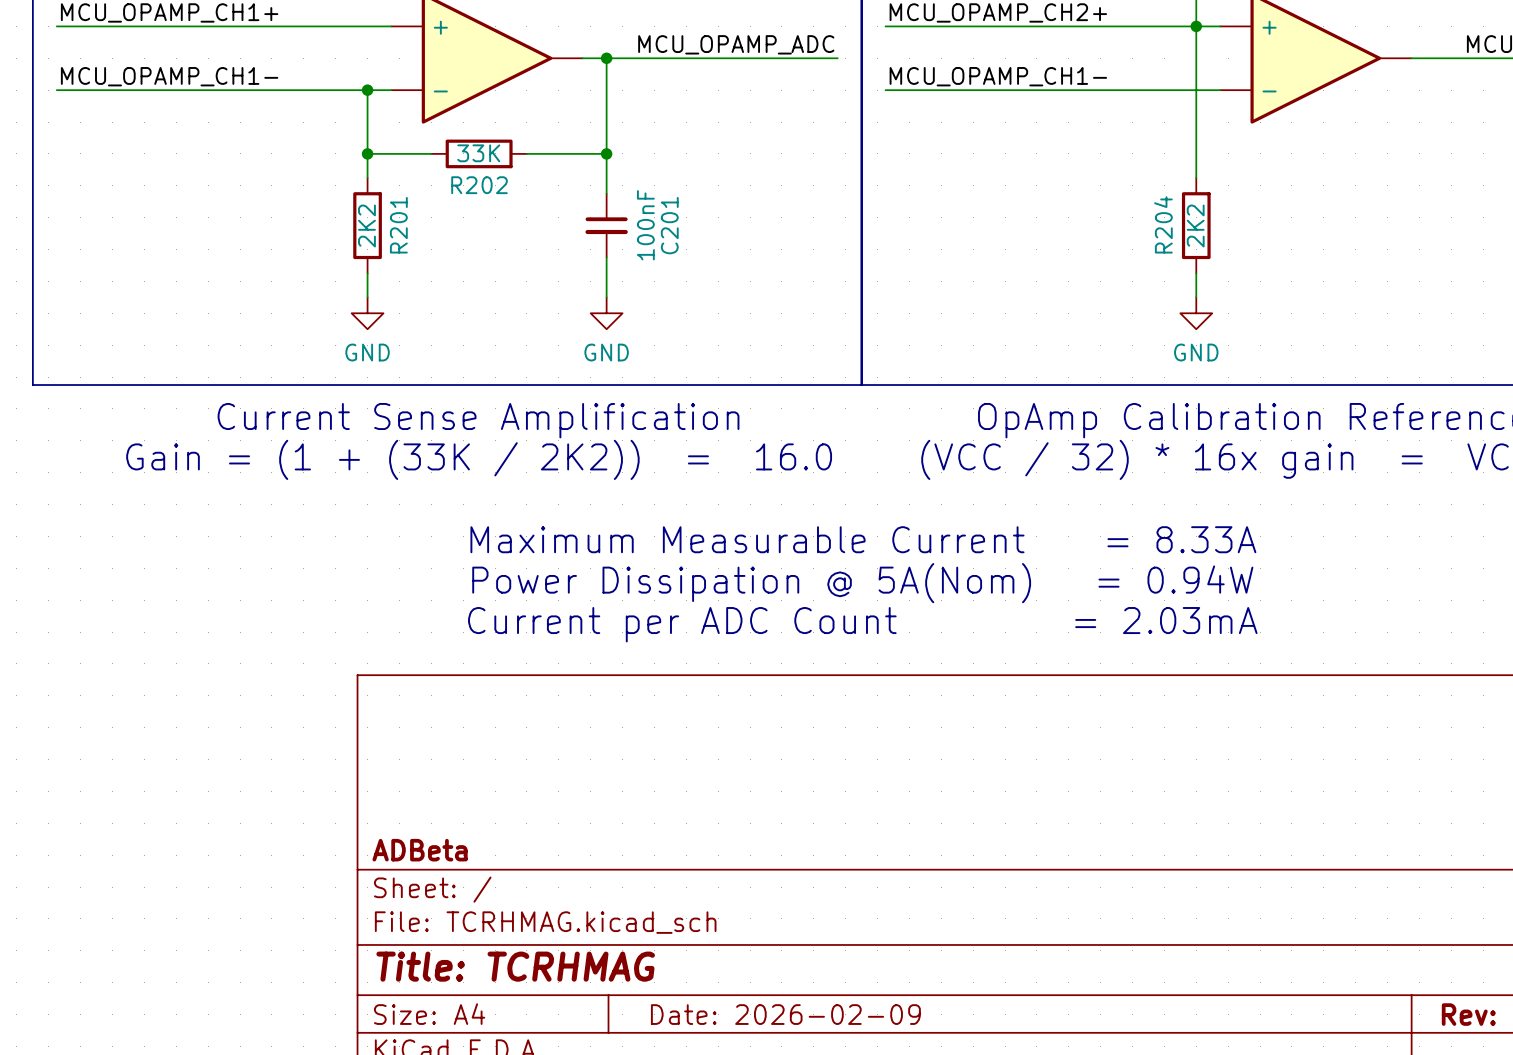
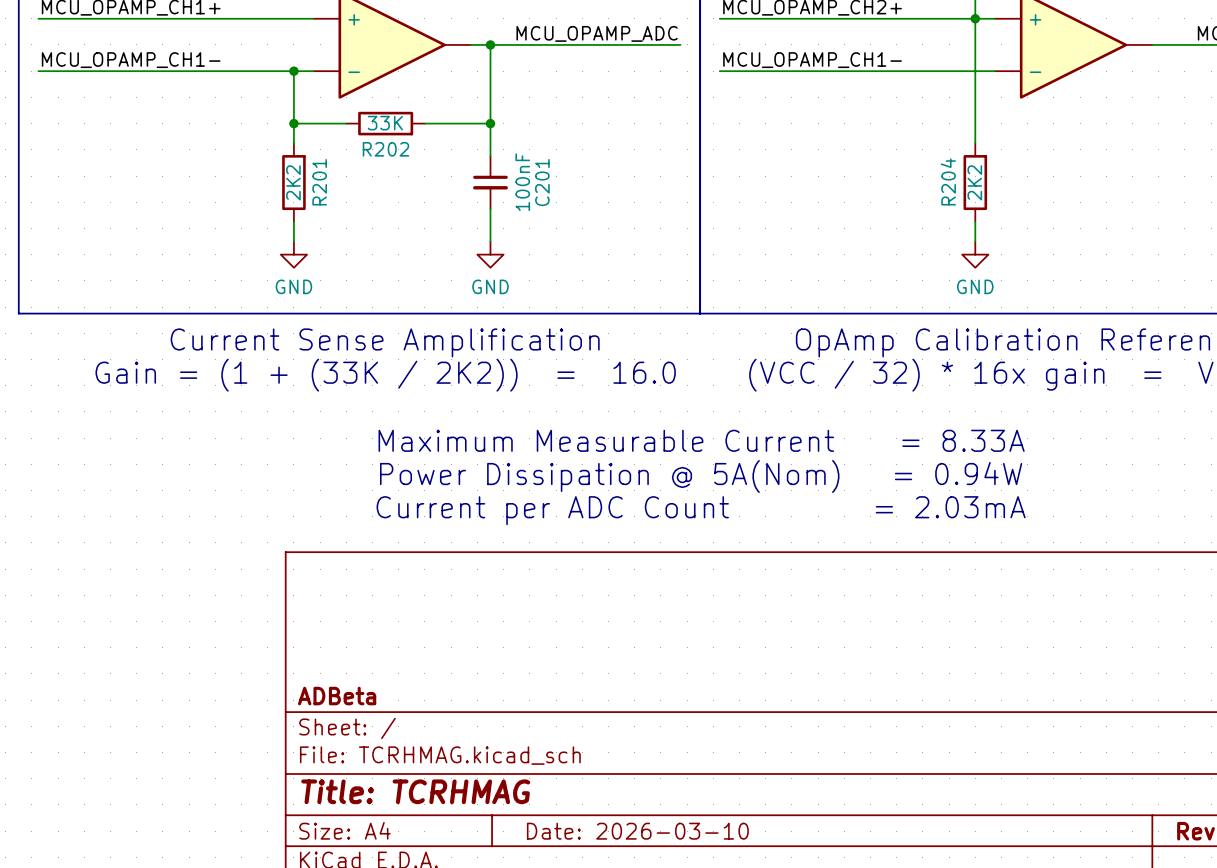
title block: Date: 2026-02-09 (785, 1014) -> Date: 2026-03-10 (637, 831)

